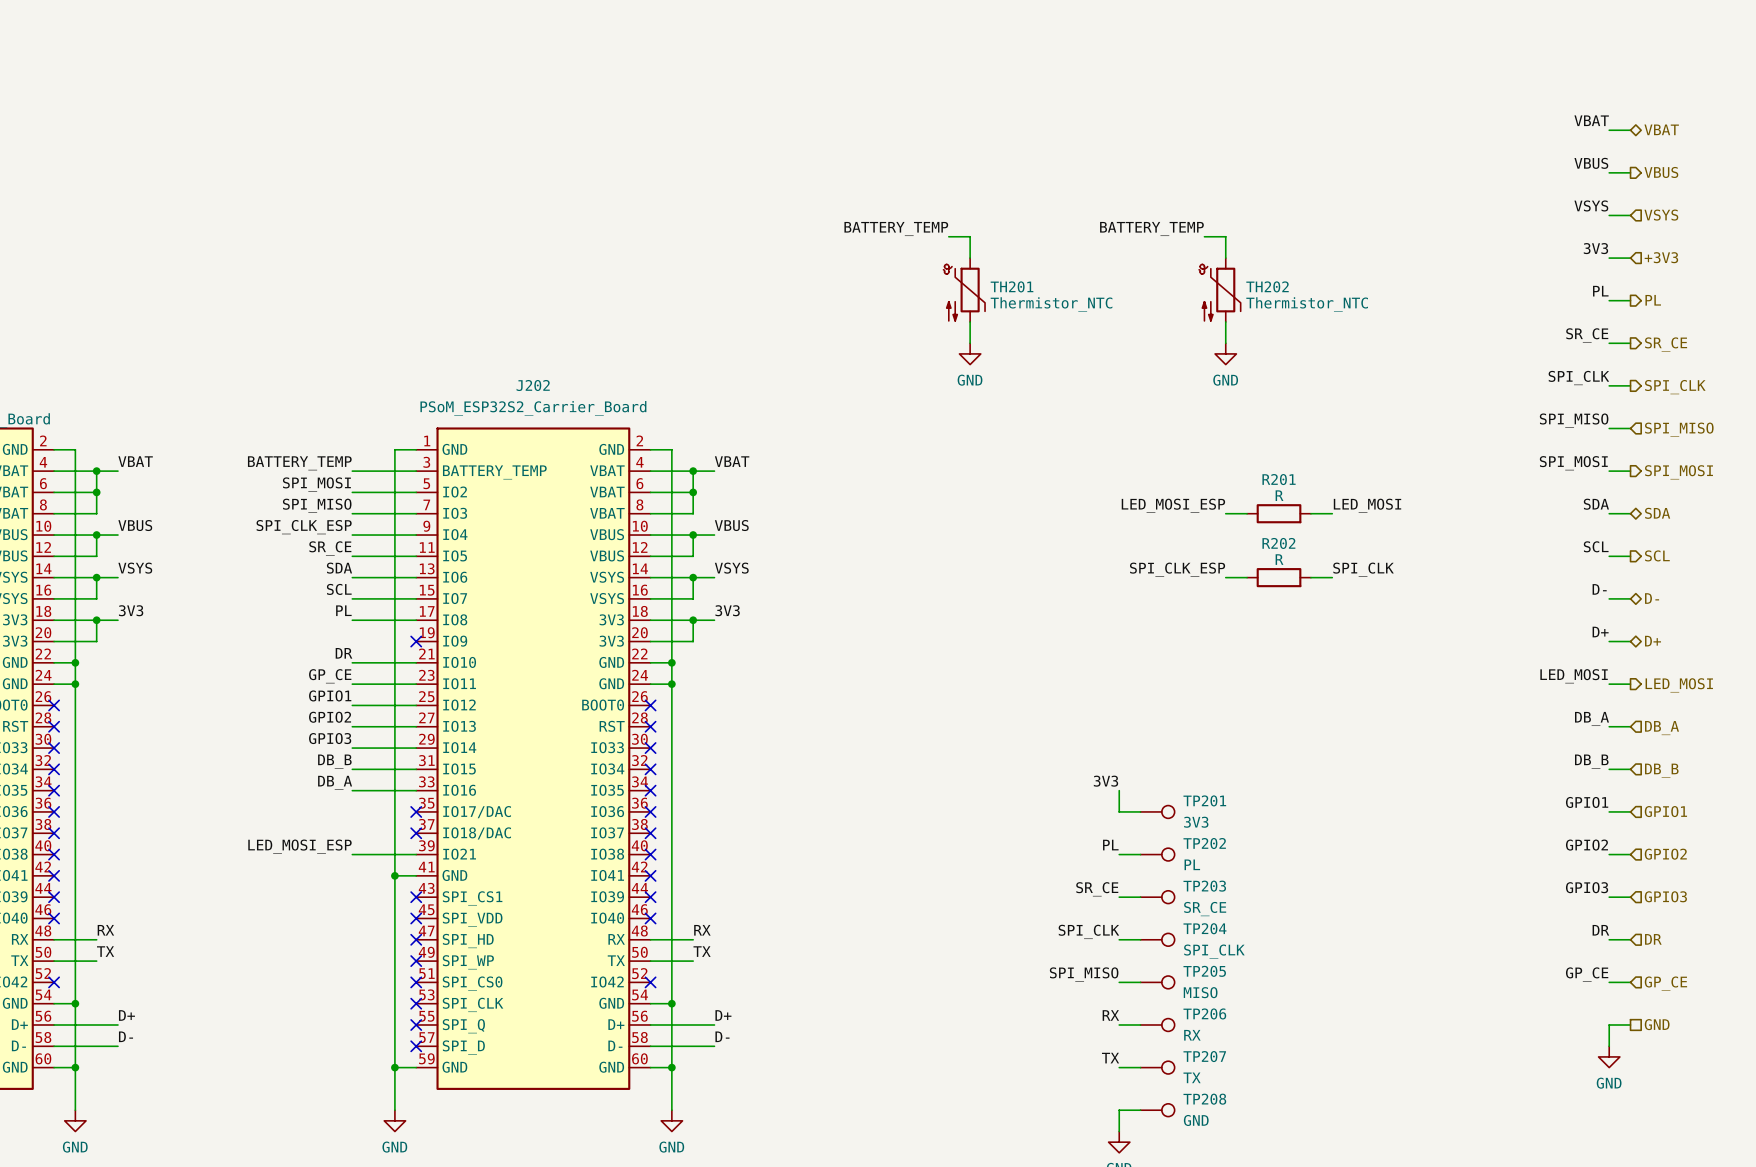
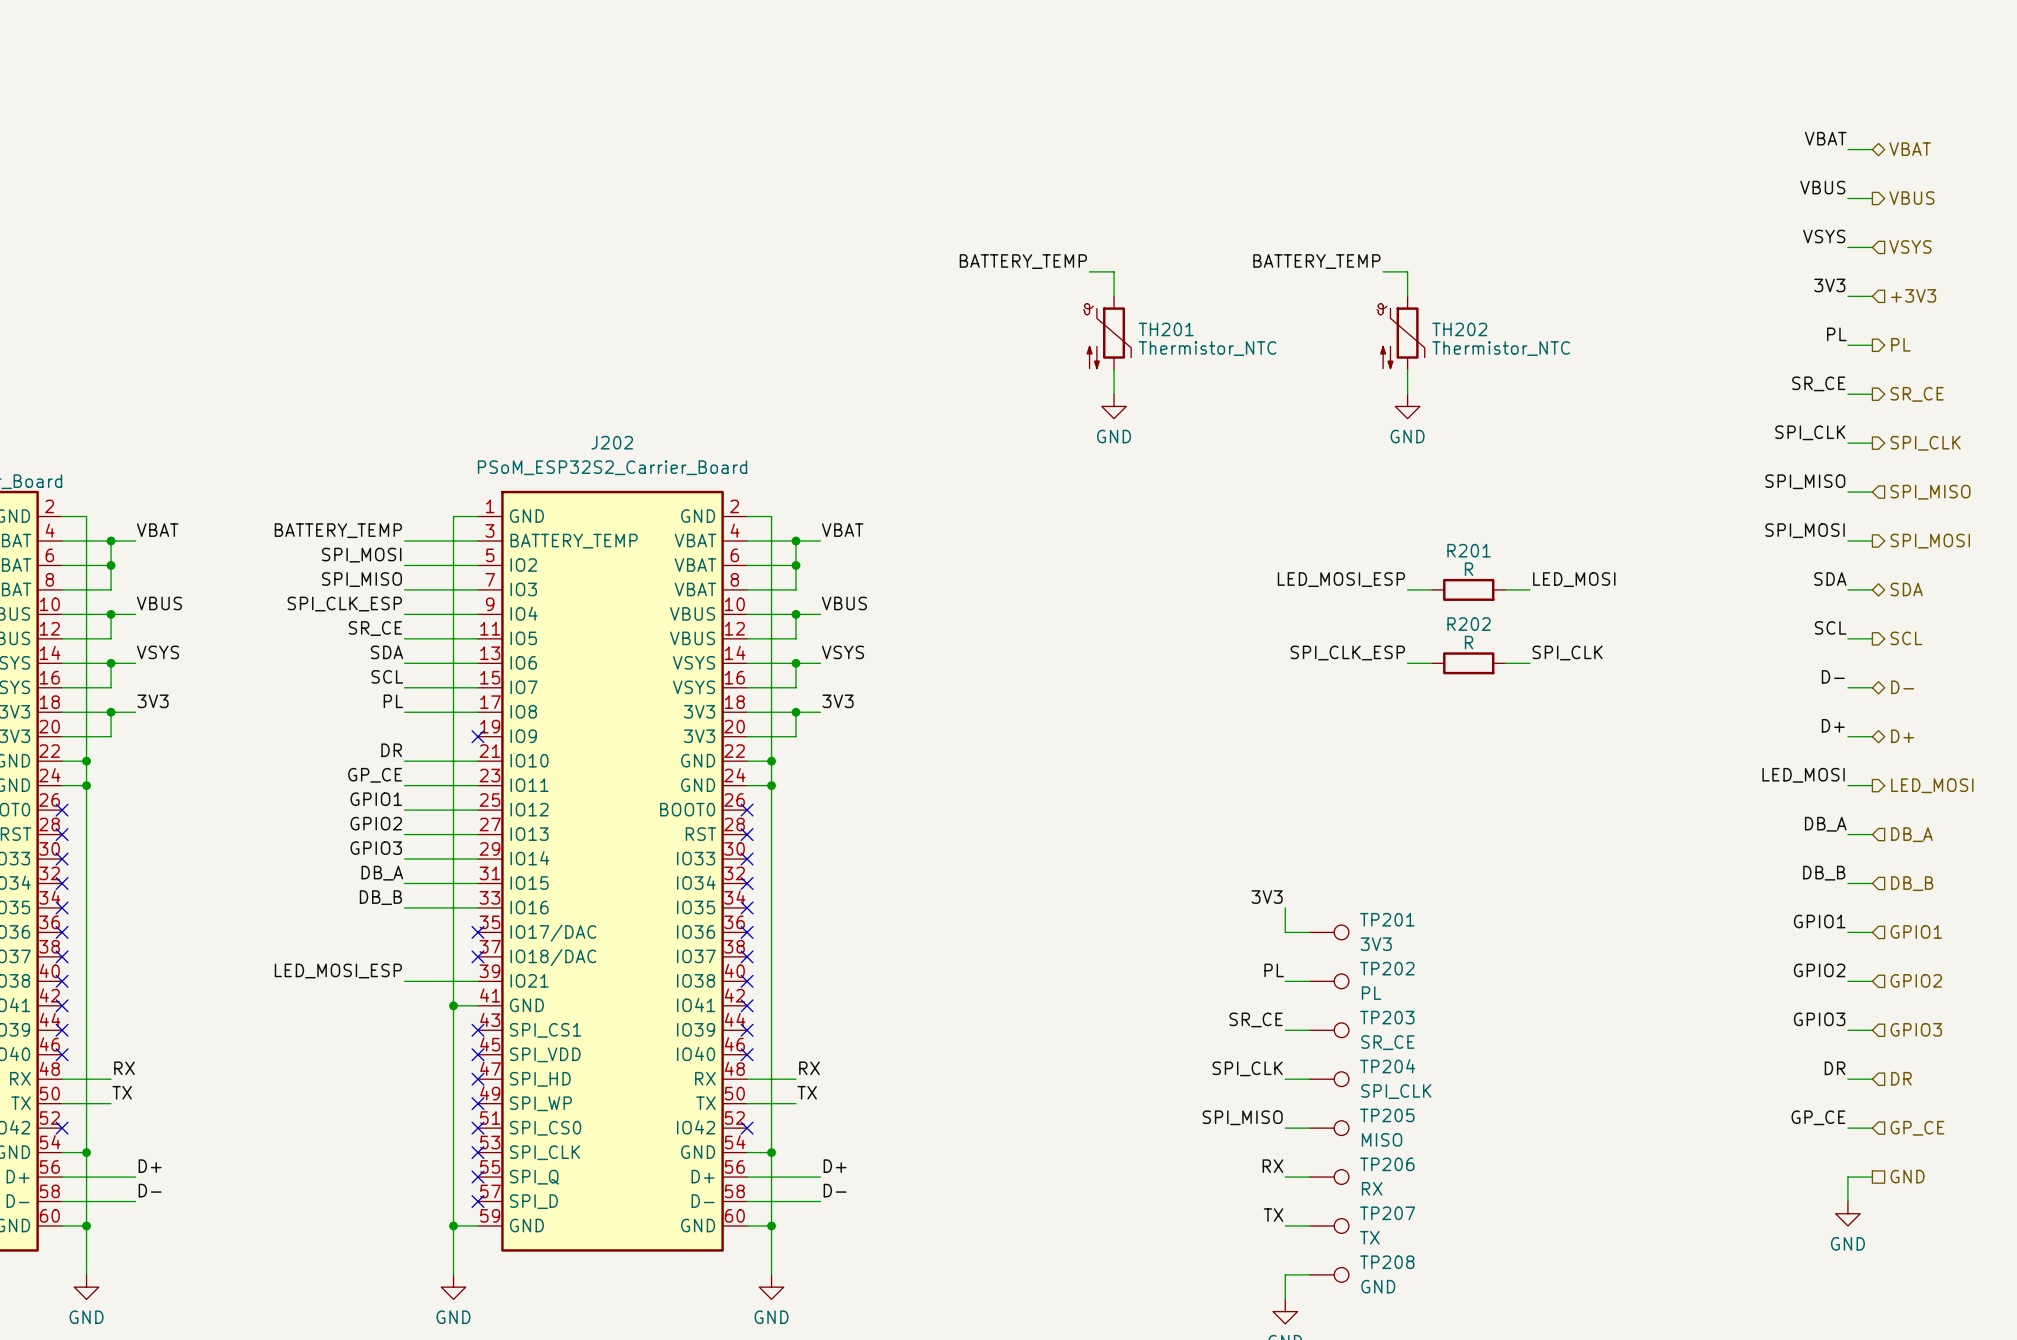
label: DB_B (334, 761) -> DB_A (382, 873)
label: DB_A (335, 782) -> DB_B (380, 897)

